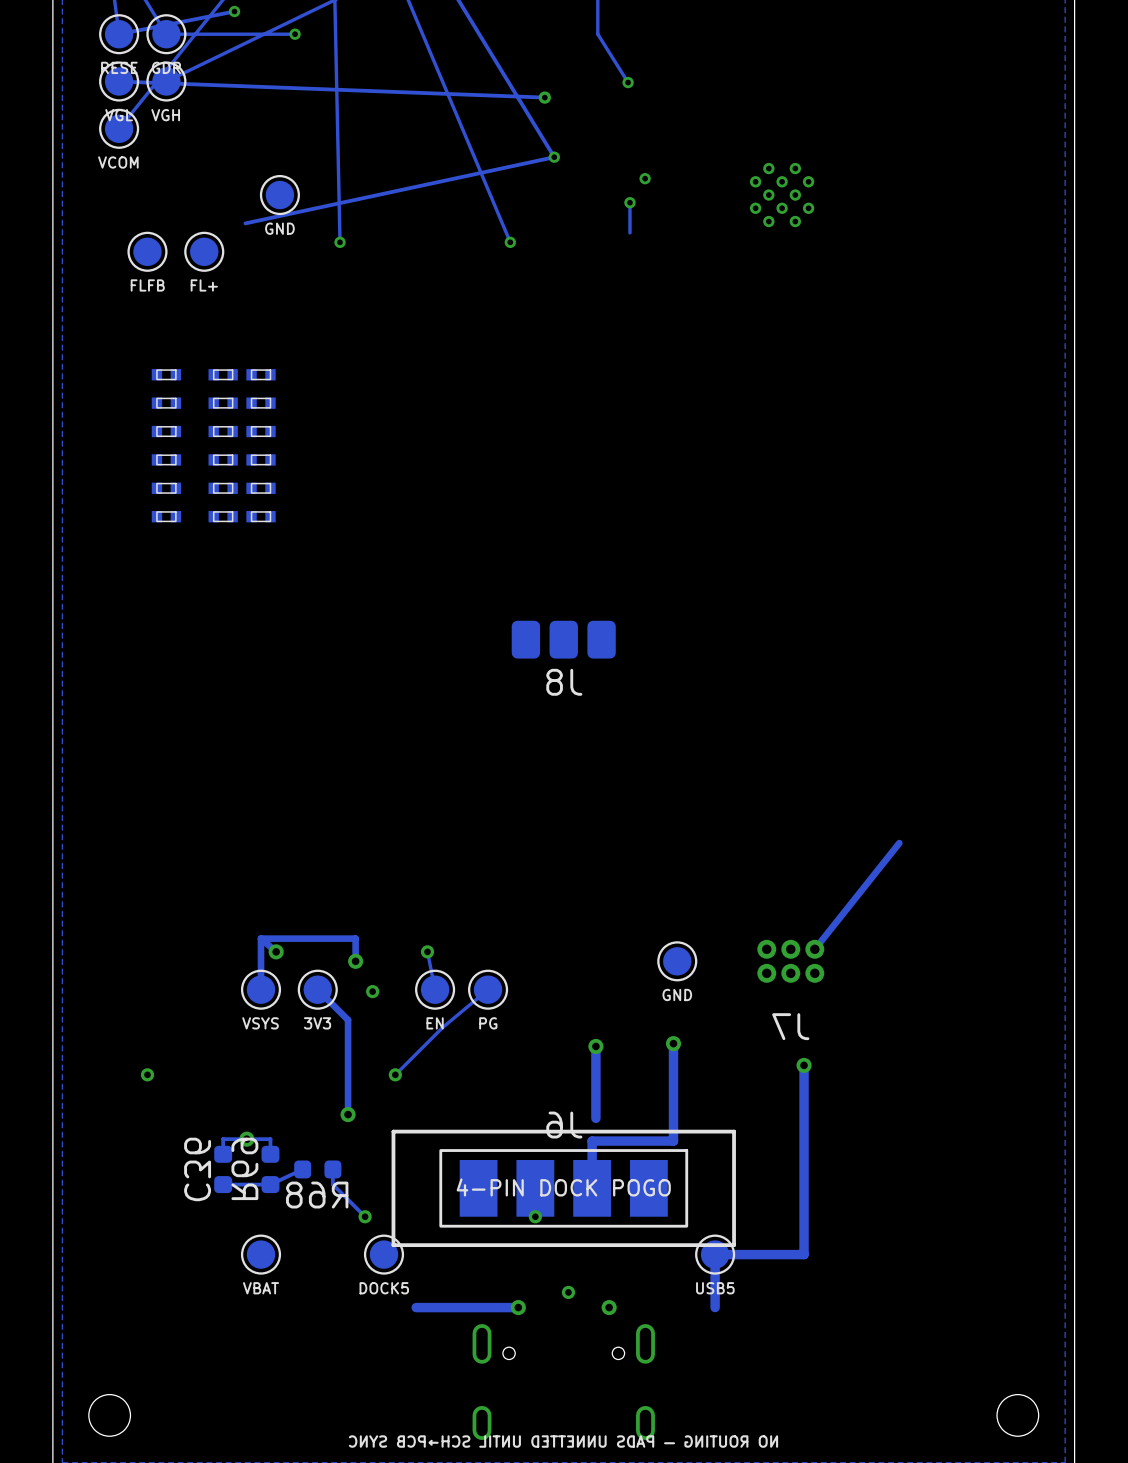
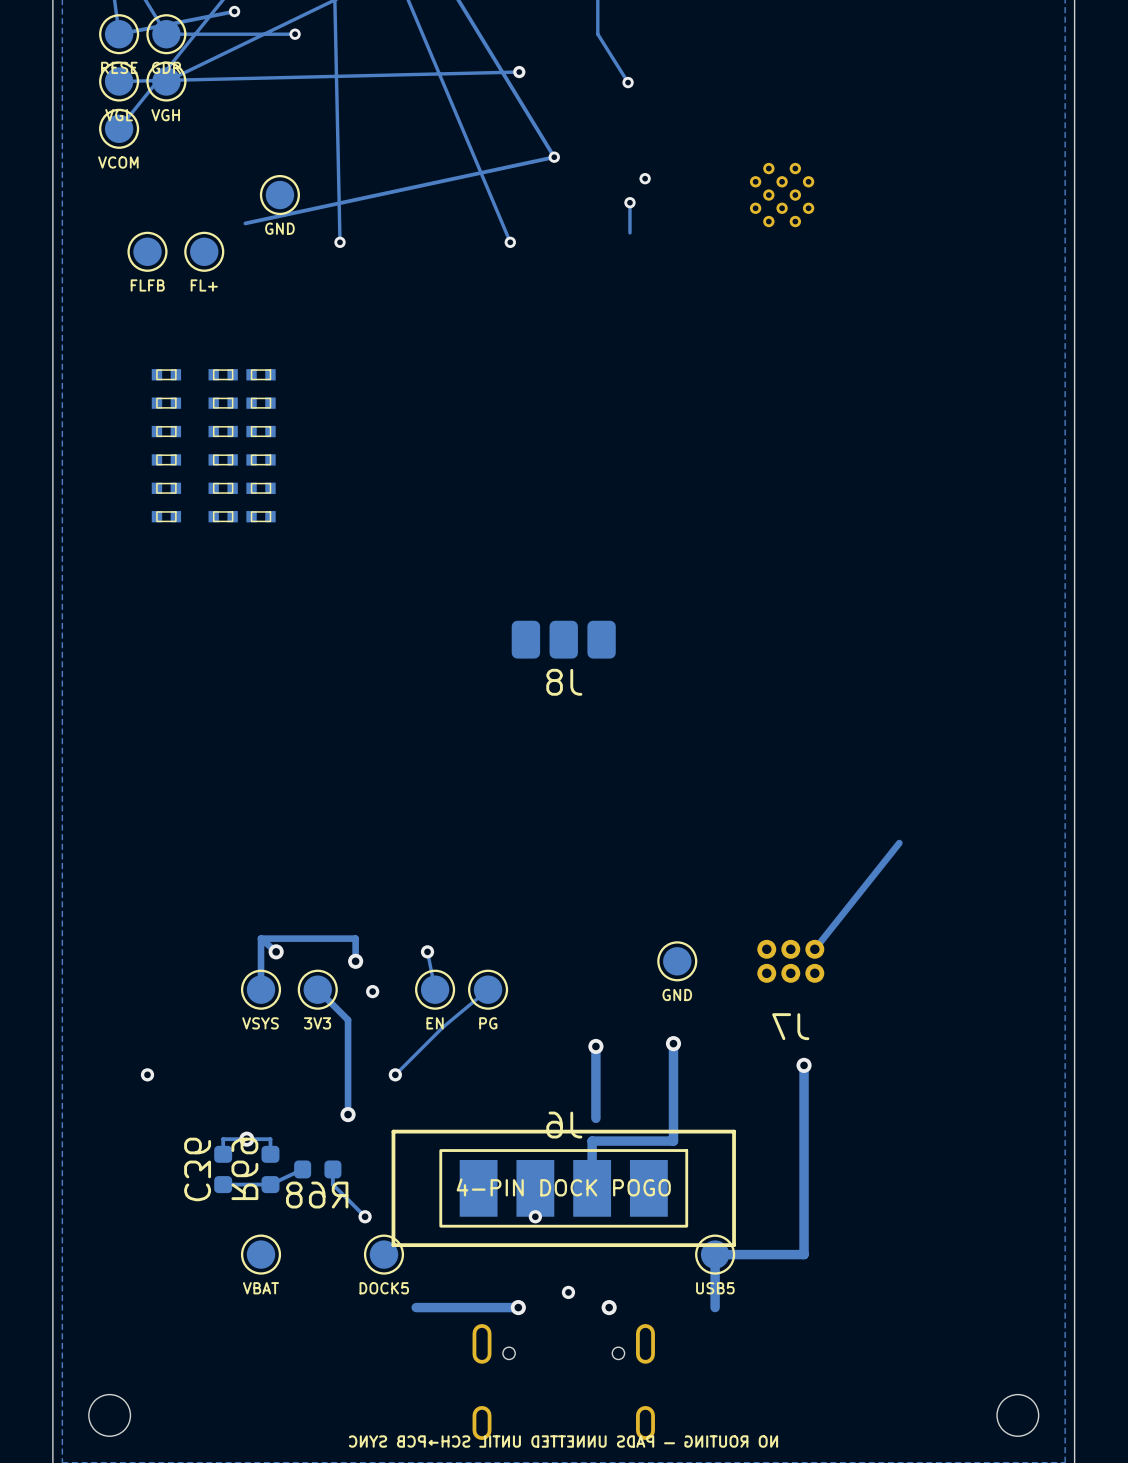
via: none -> (519, 72)
track: (119, 81) (544, 97) -> (119, 81) (519, 72)
via: (544, 97) -> none

